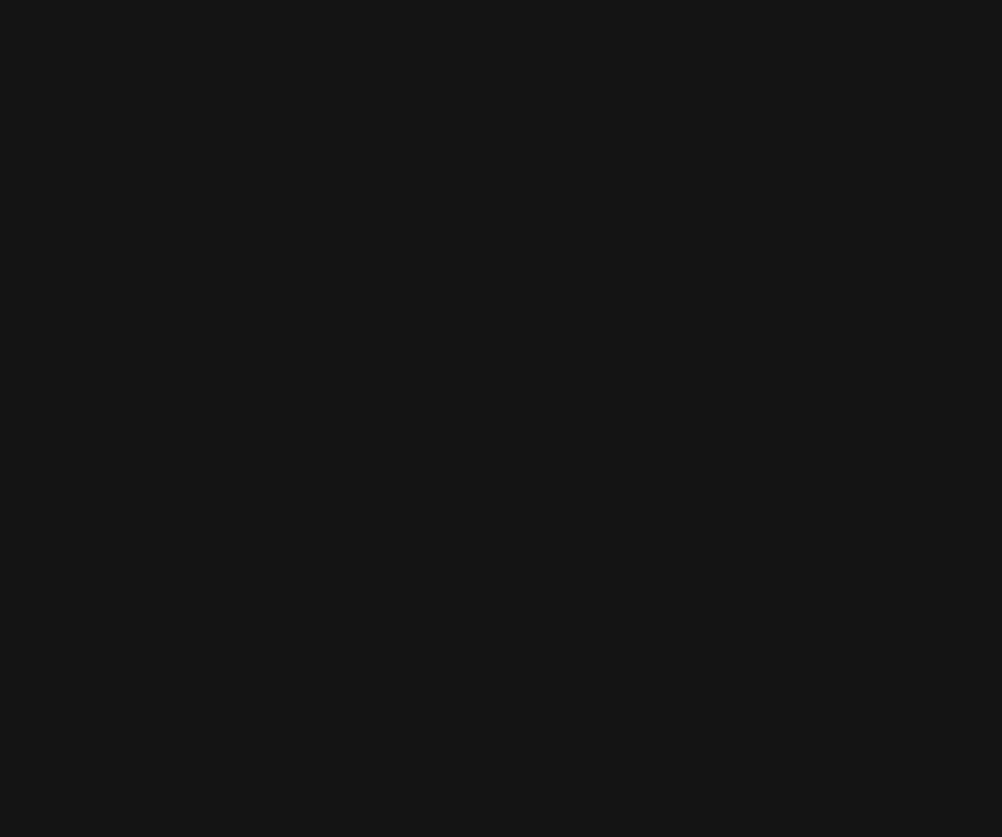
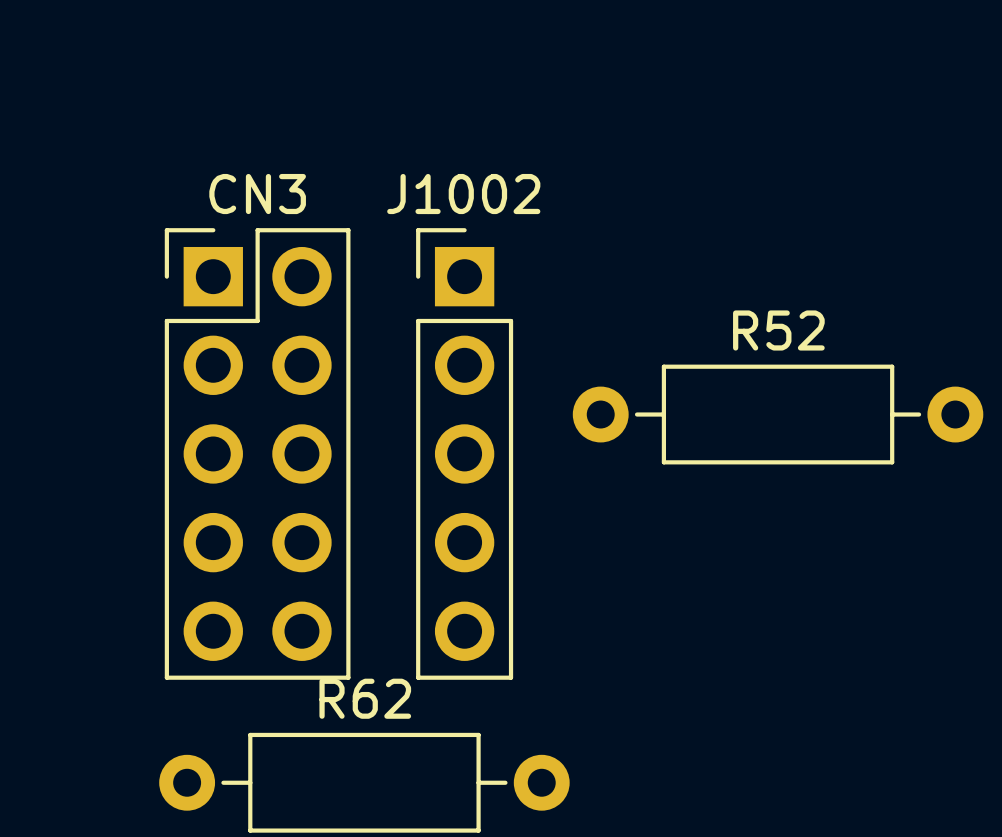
R52: none -> (778, 414)
CN3: none -> (257, 453)
J1002: none -> (464, 453)
R62: none -> (364, 782)

